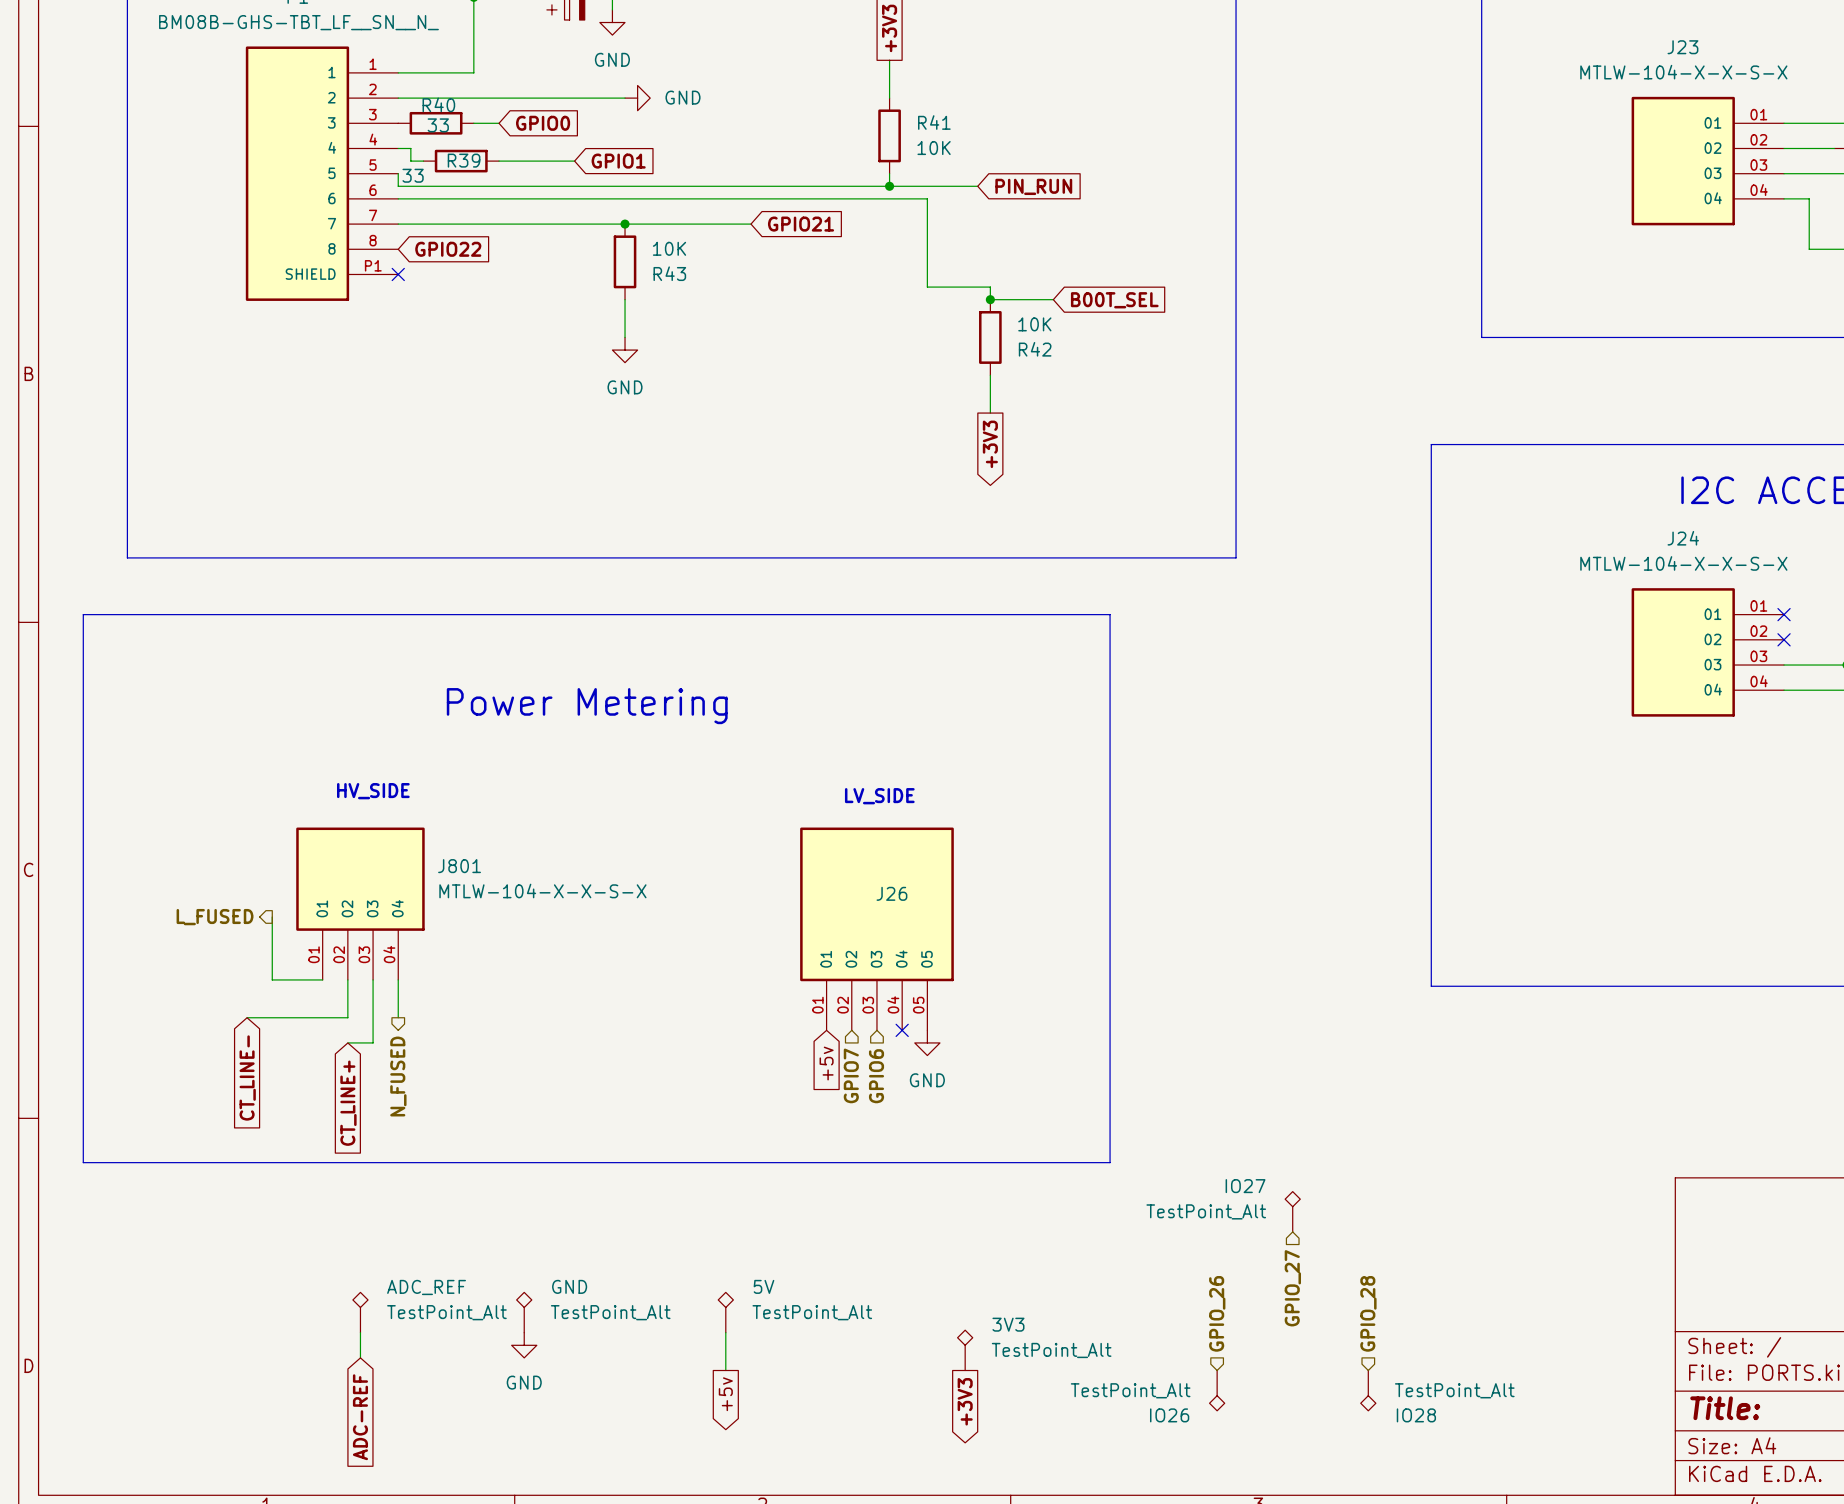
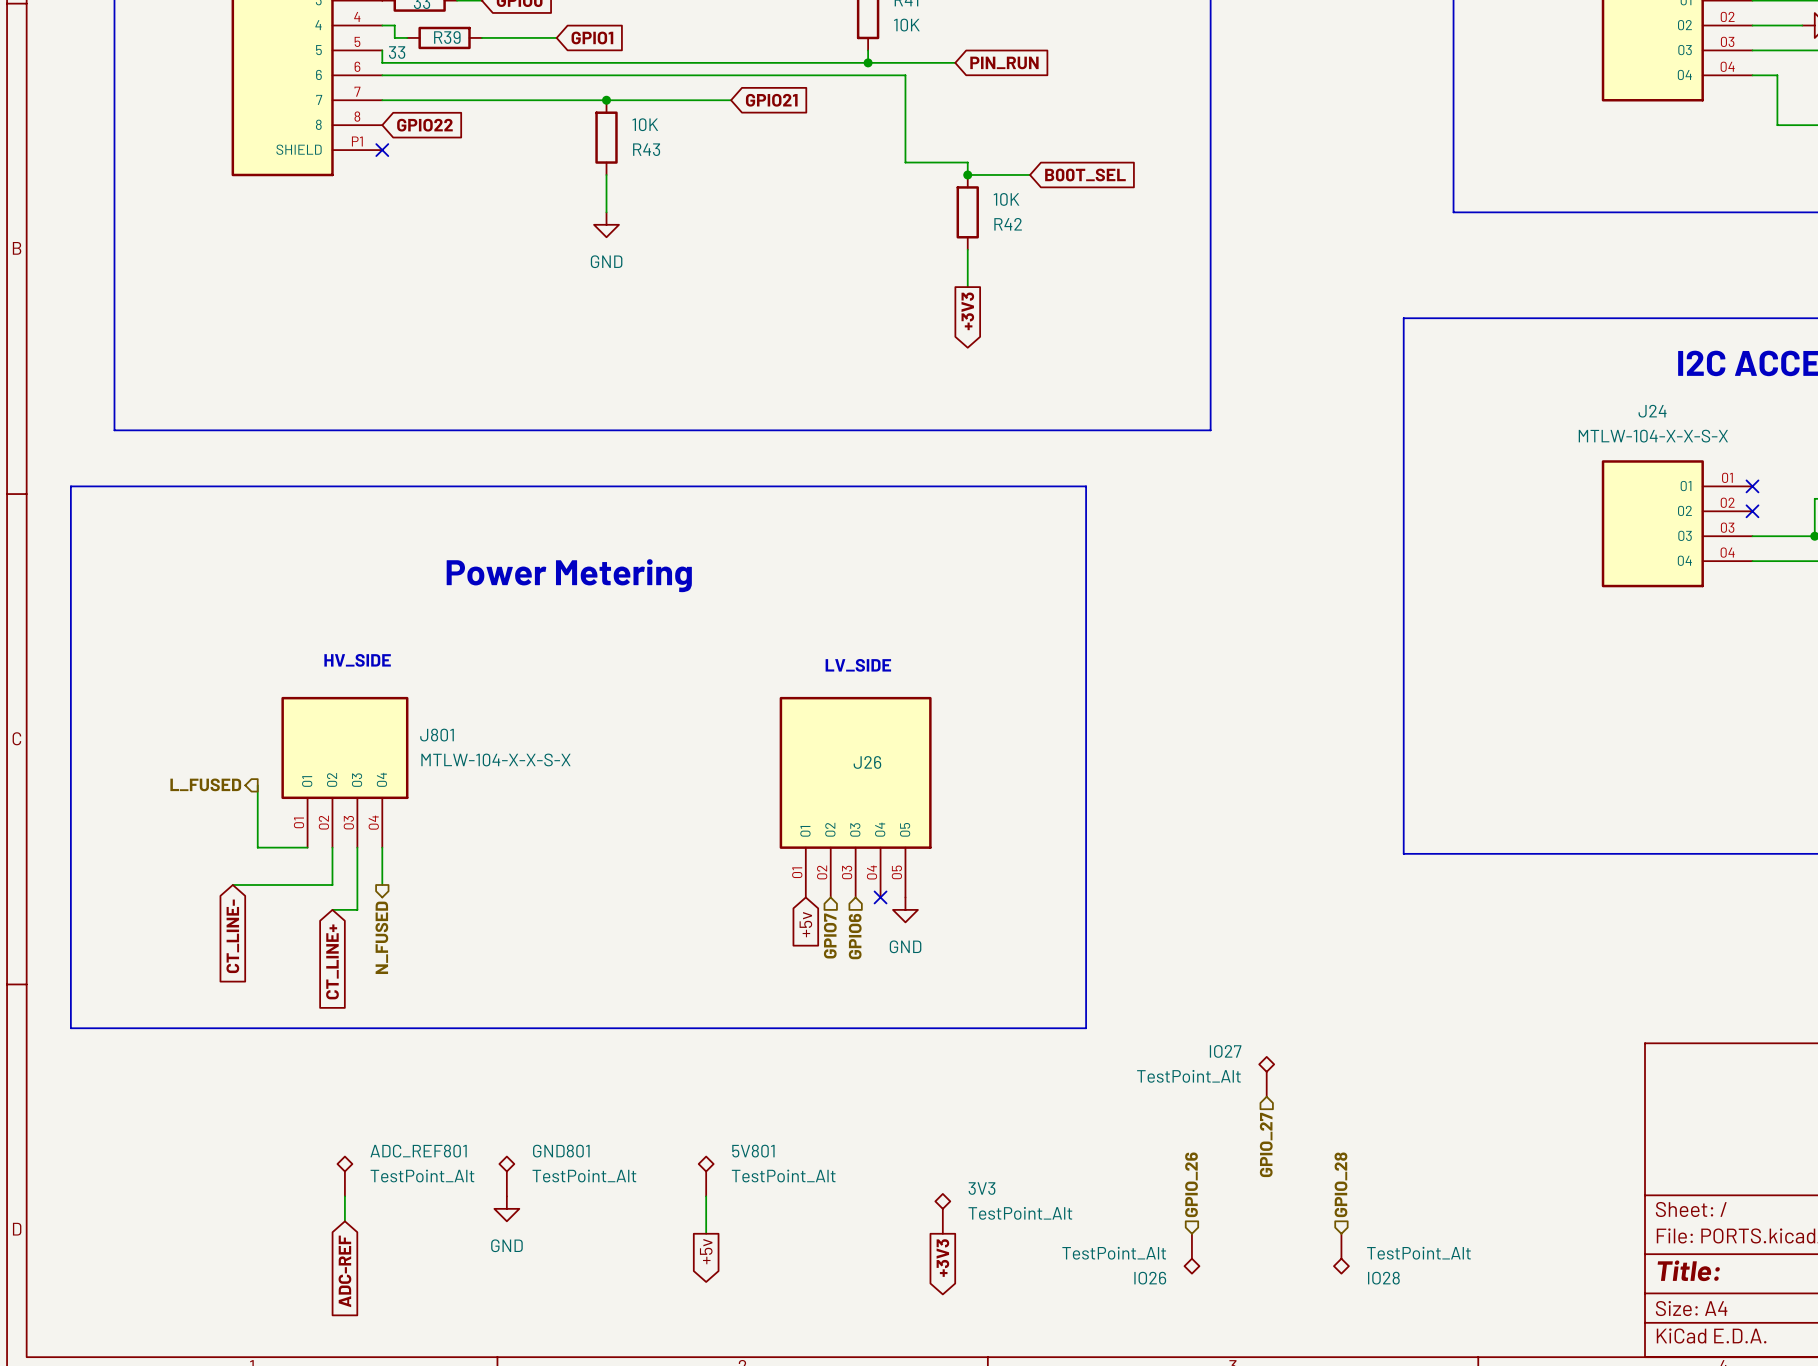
GND name: GND (569, 1286) -> GND801 (561, 1151)
5V name: 5V (763, 1286) -> 5V801 (753, 1151)
ADC_REF name: ADC_REF (426, 1287) -> ADC_REF801 (418, 1151)

